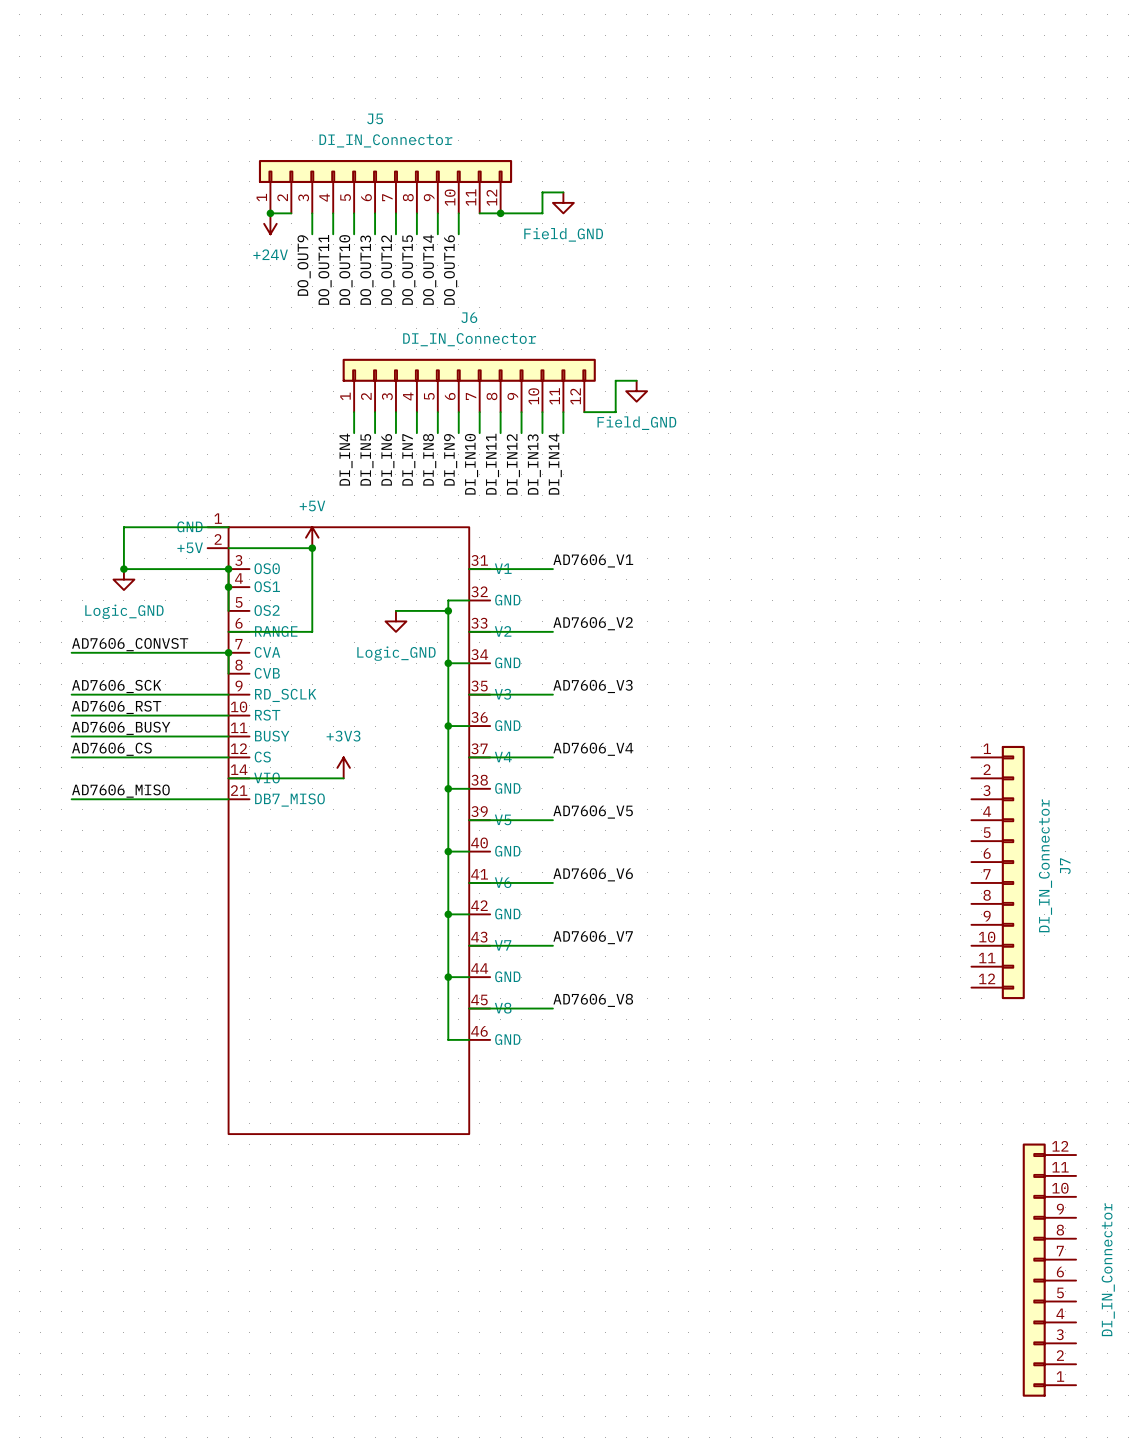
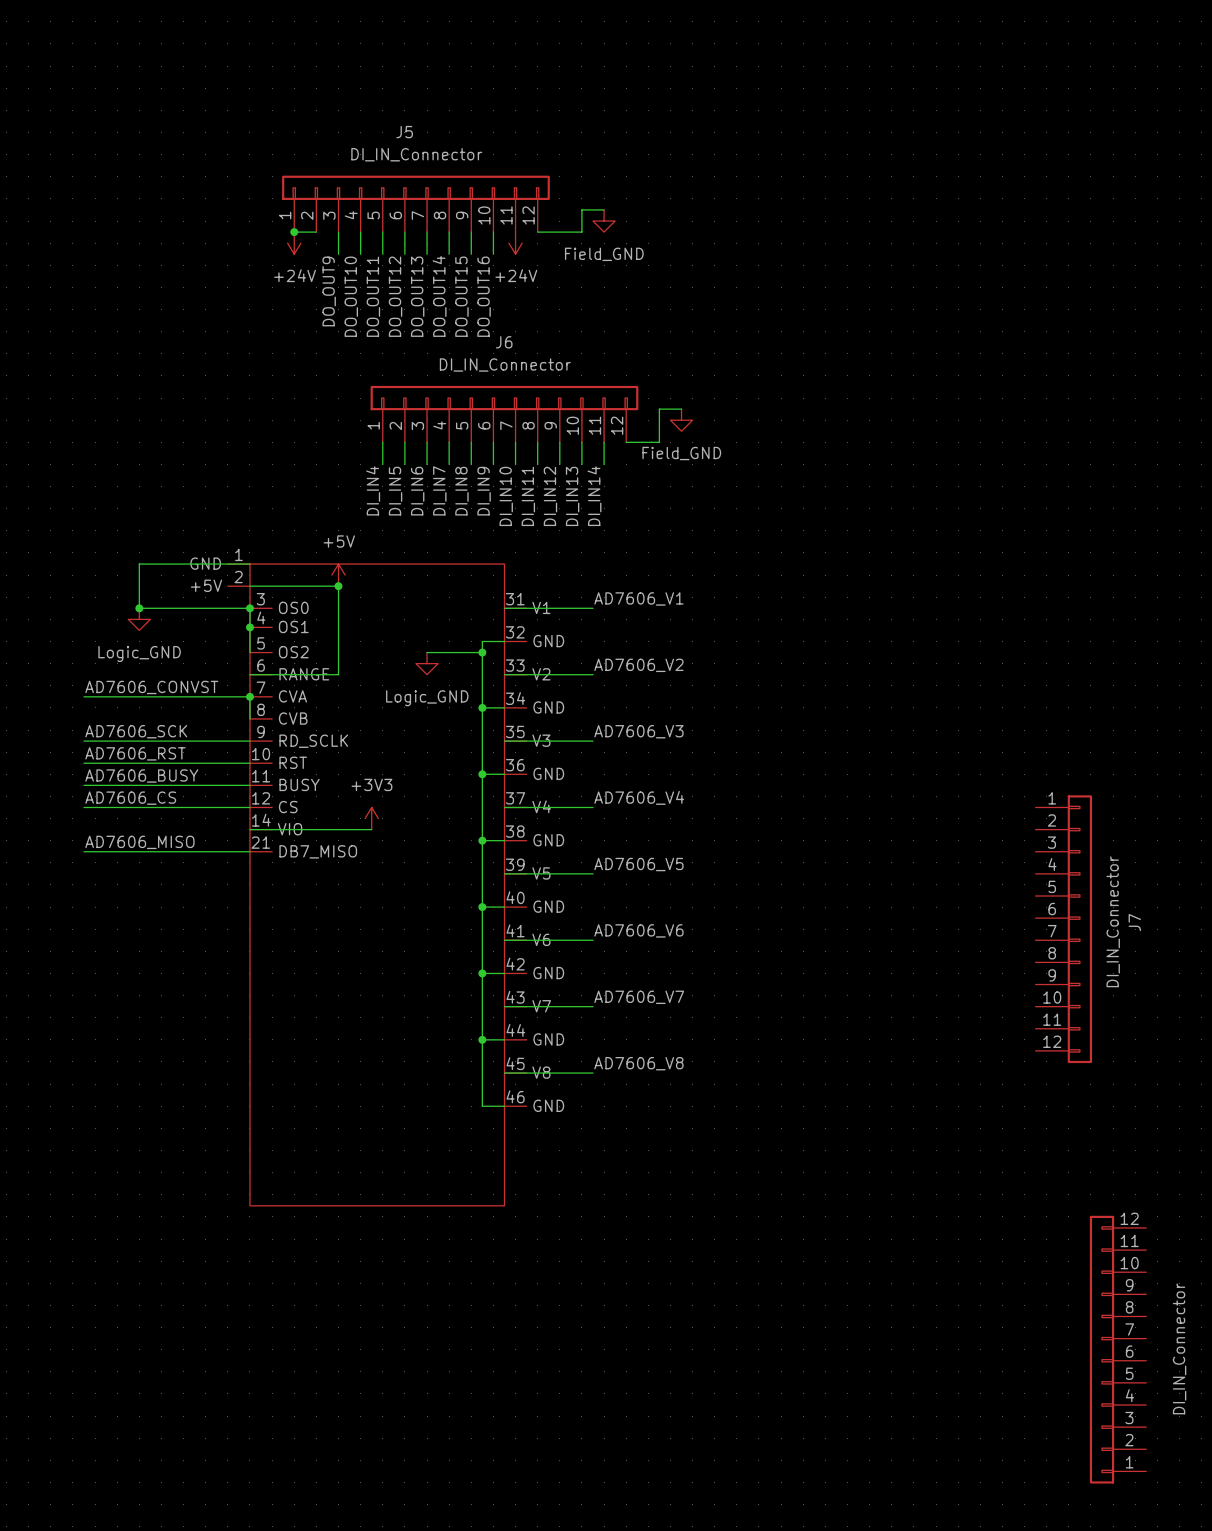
wire: (479, 213) (500, 213) -> none
junction: (500, 213) -> none
power symbol: none -> +24V (515, 243)
label: DO_OUT11 (325, 269) -> DO_OUT10 (351, 296)
label: DO_OUT10 (345, 269) -> DO_OUT11 (373, 296)
label: DO_OUT14 (429, 269) -> DO_OUT15 (461, 296)
label: DO_OUT13 (366, 270) -> DO_OUT12 (395, 296)
label: DO_OUT12 (387, 270) -> DO_OUT13 (417, 296)
label: DO_OUT15 (408, 270) -> DO_OUT14 (439, 296)

